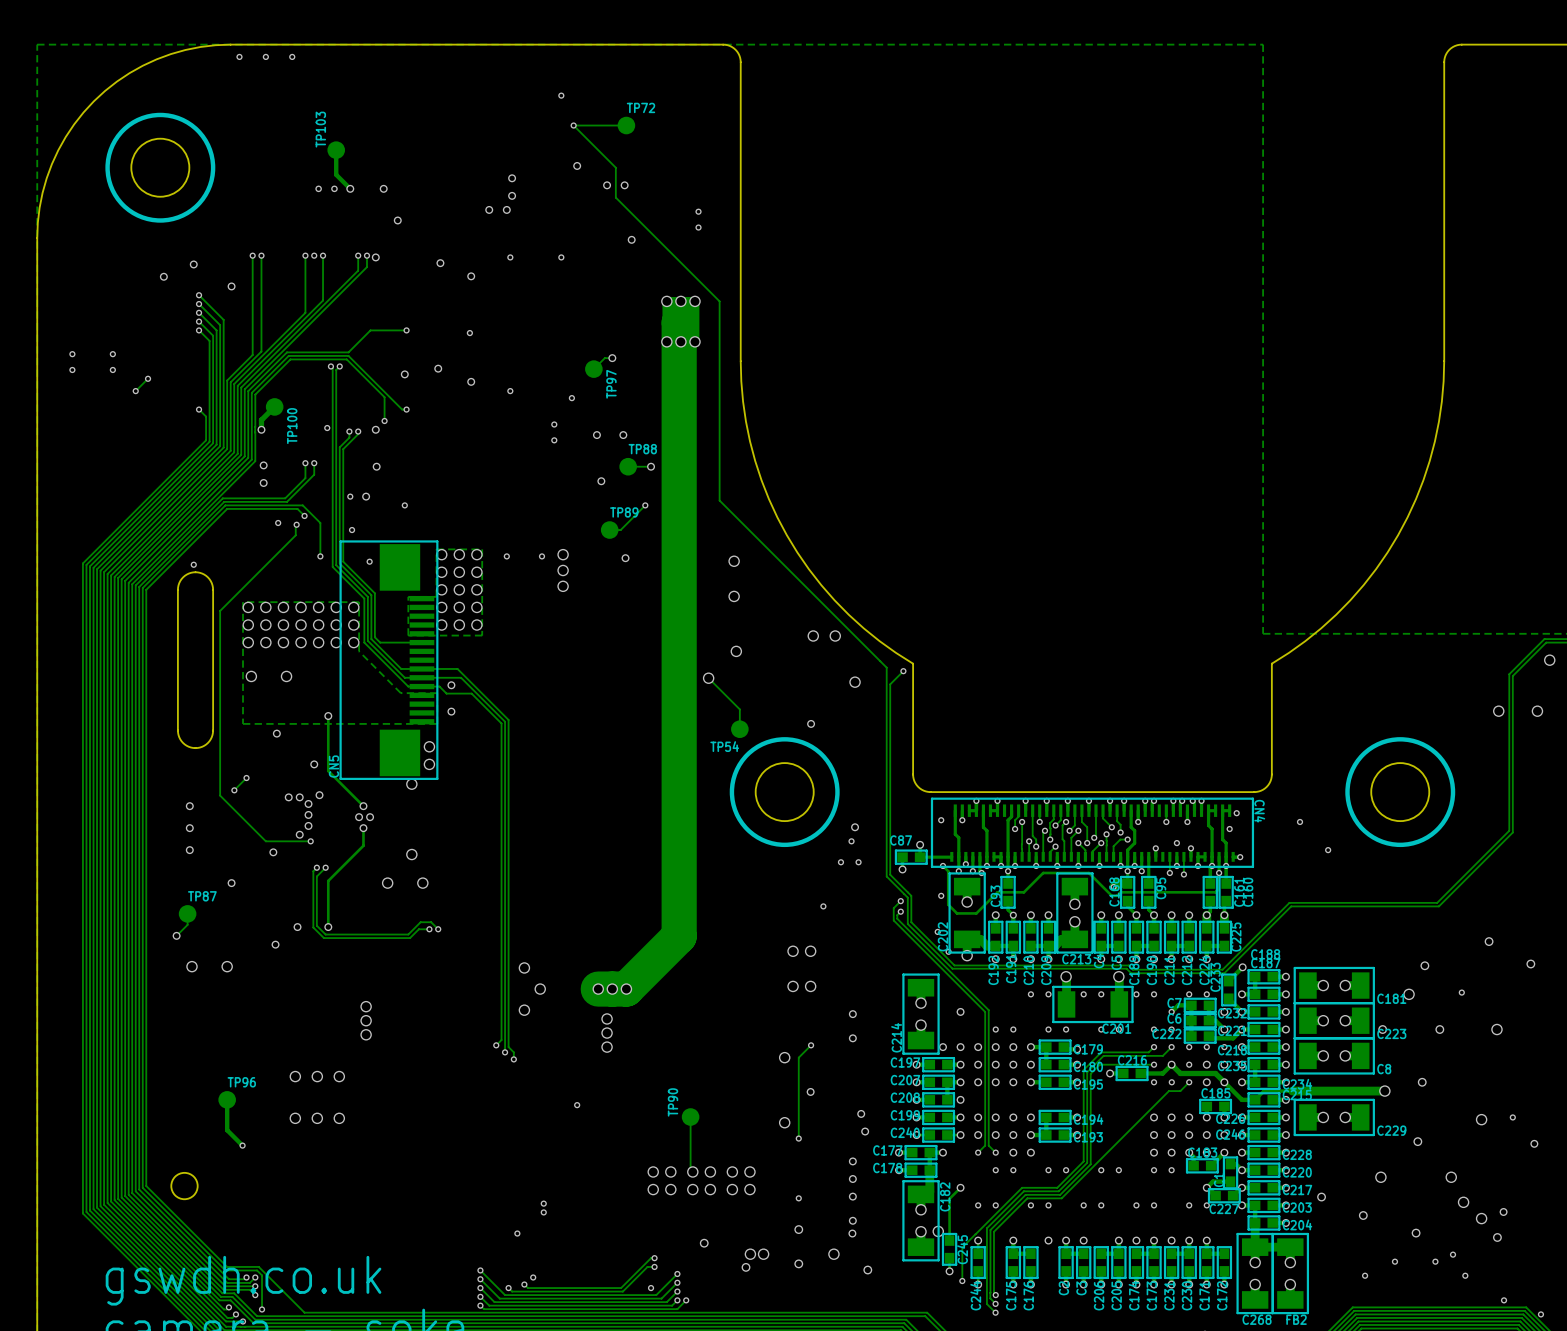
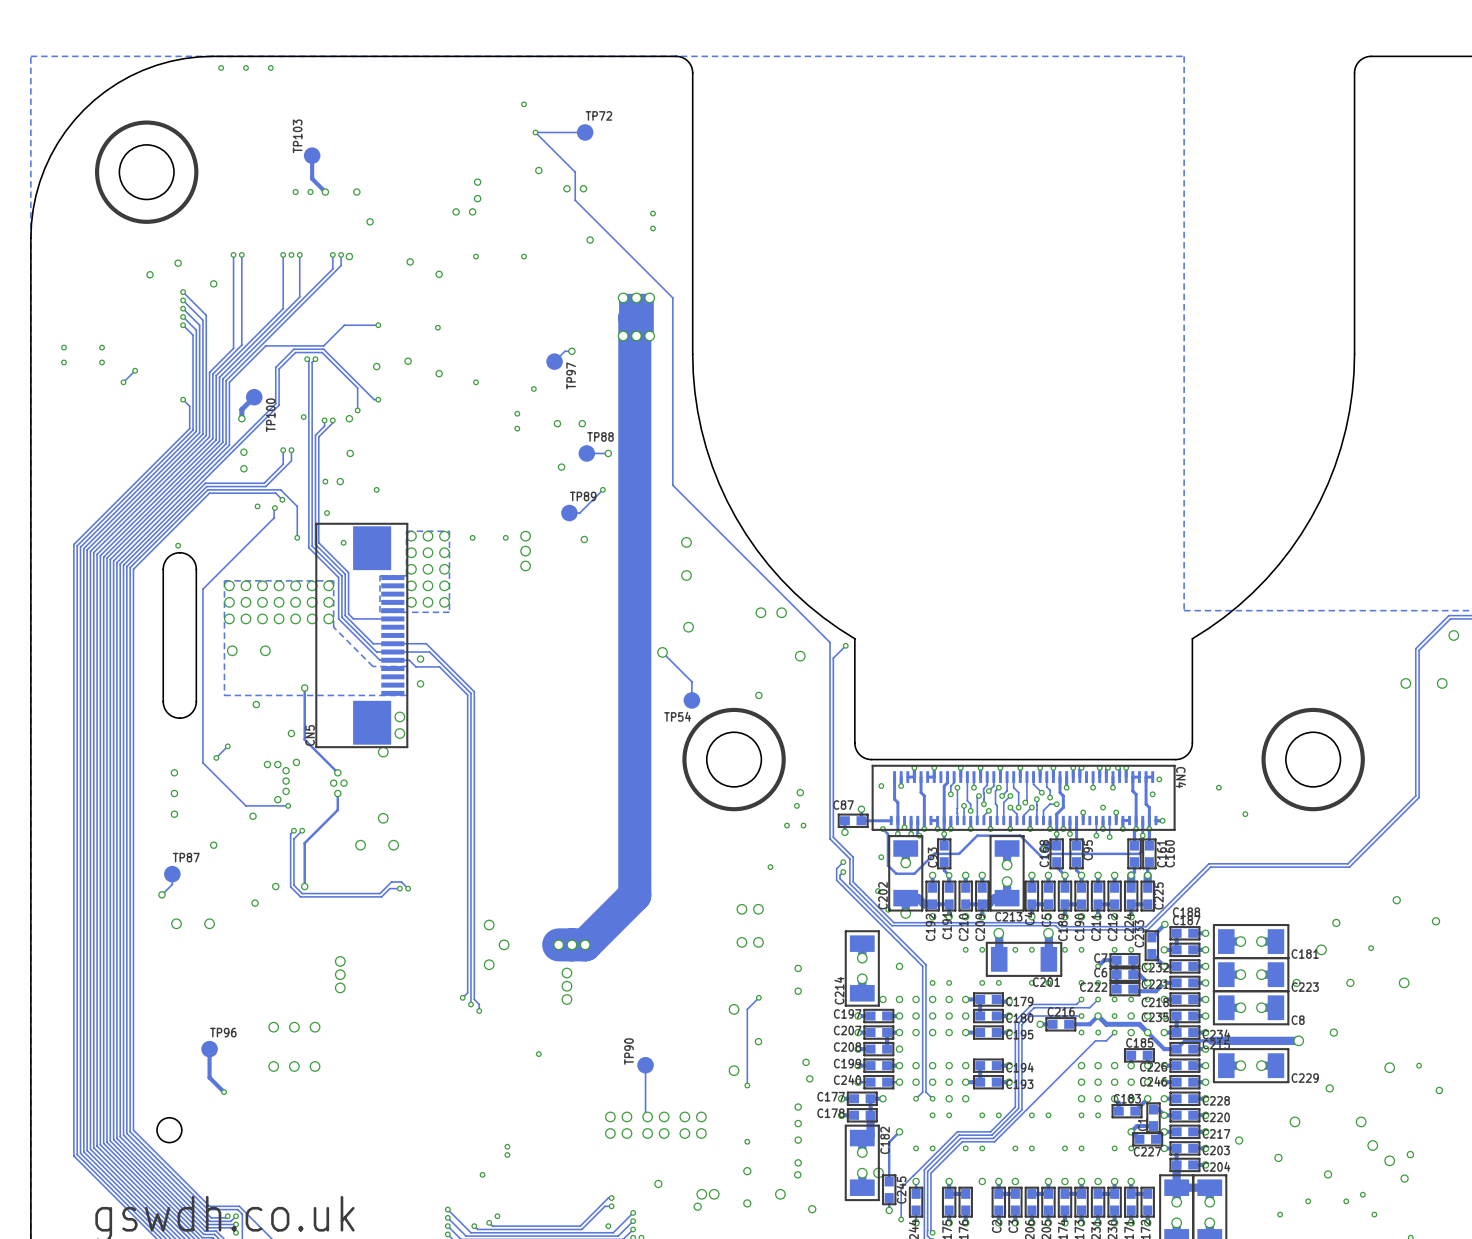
track: (316, 355) (288, 355) (251, 392) (251, 459) -> (293, 349) (275, 367) (275, 403) (232, 446)
track: (318, 359) (290, 359) (255, 394) (255, 427) -> (295, 352) (279, 369) (279, 405) (236, 448)
track: (255, 427) (255, 432) -> none
track: (255, 432) (255, 461) -> none

